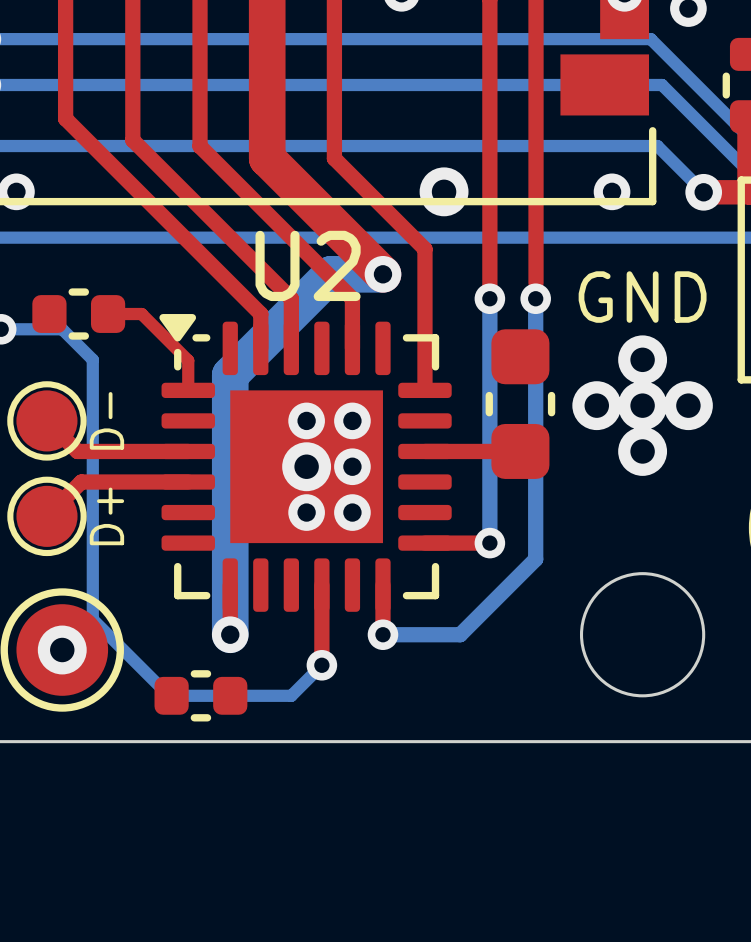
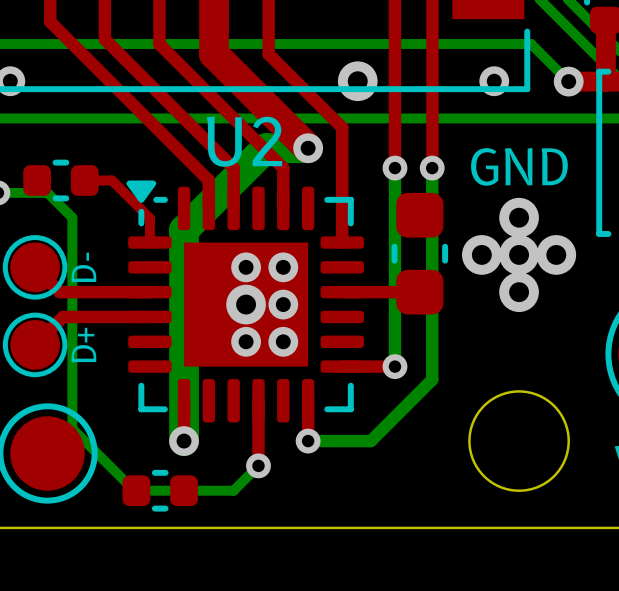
via: (62, 650) -> none

